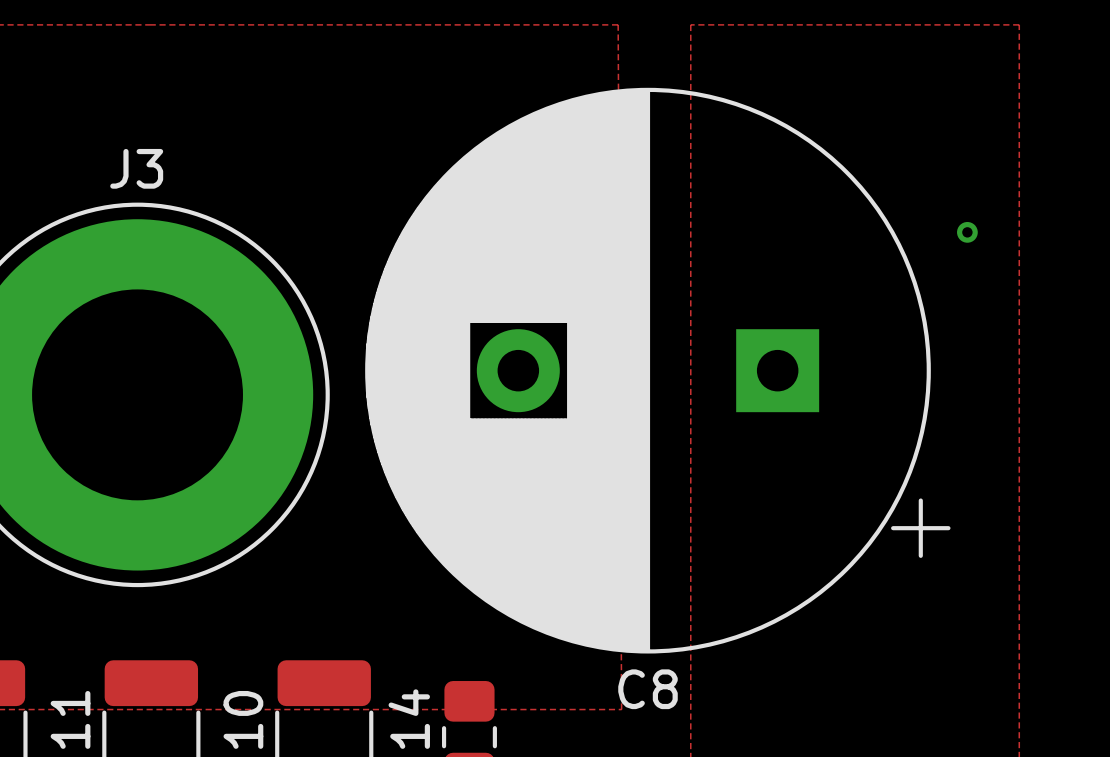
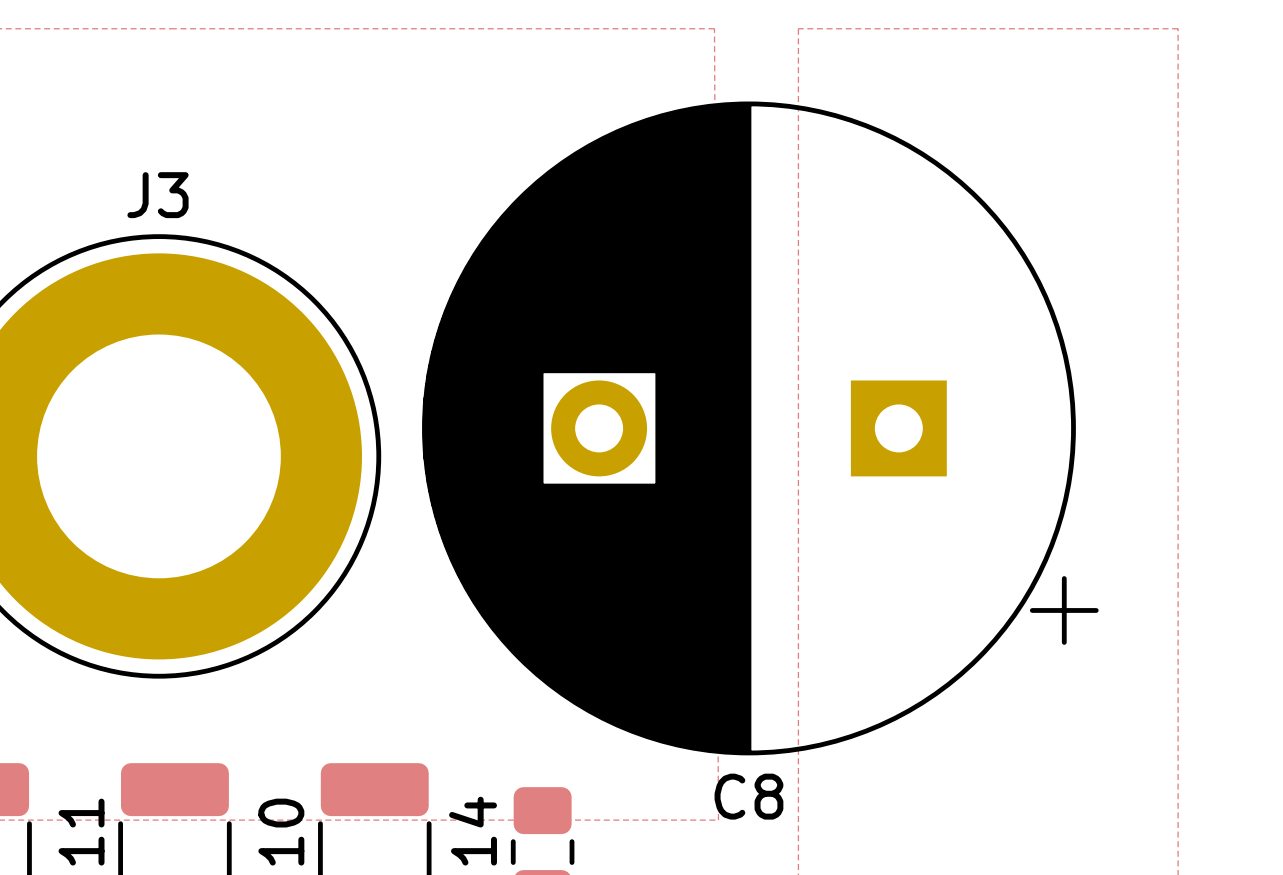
via: (967, 232) -> none

